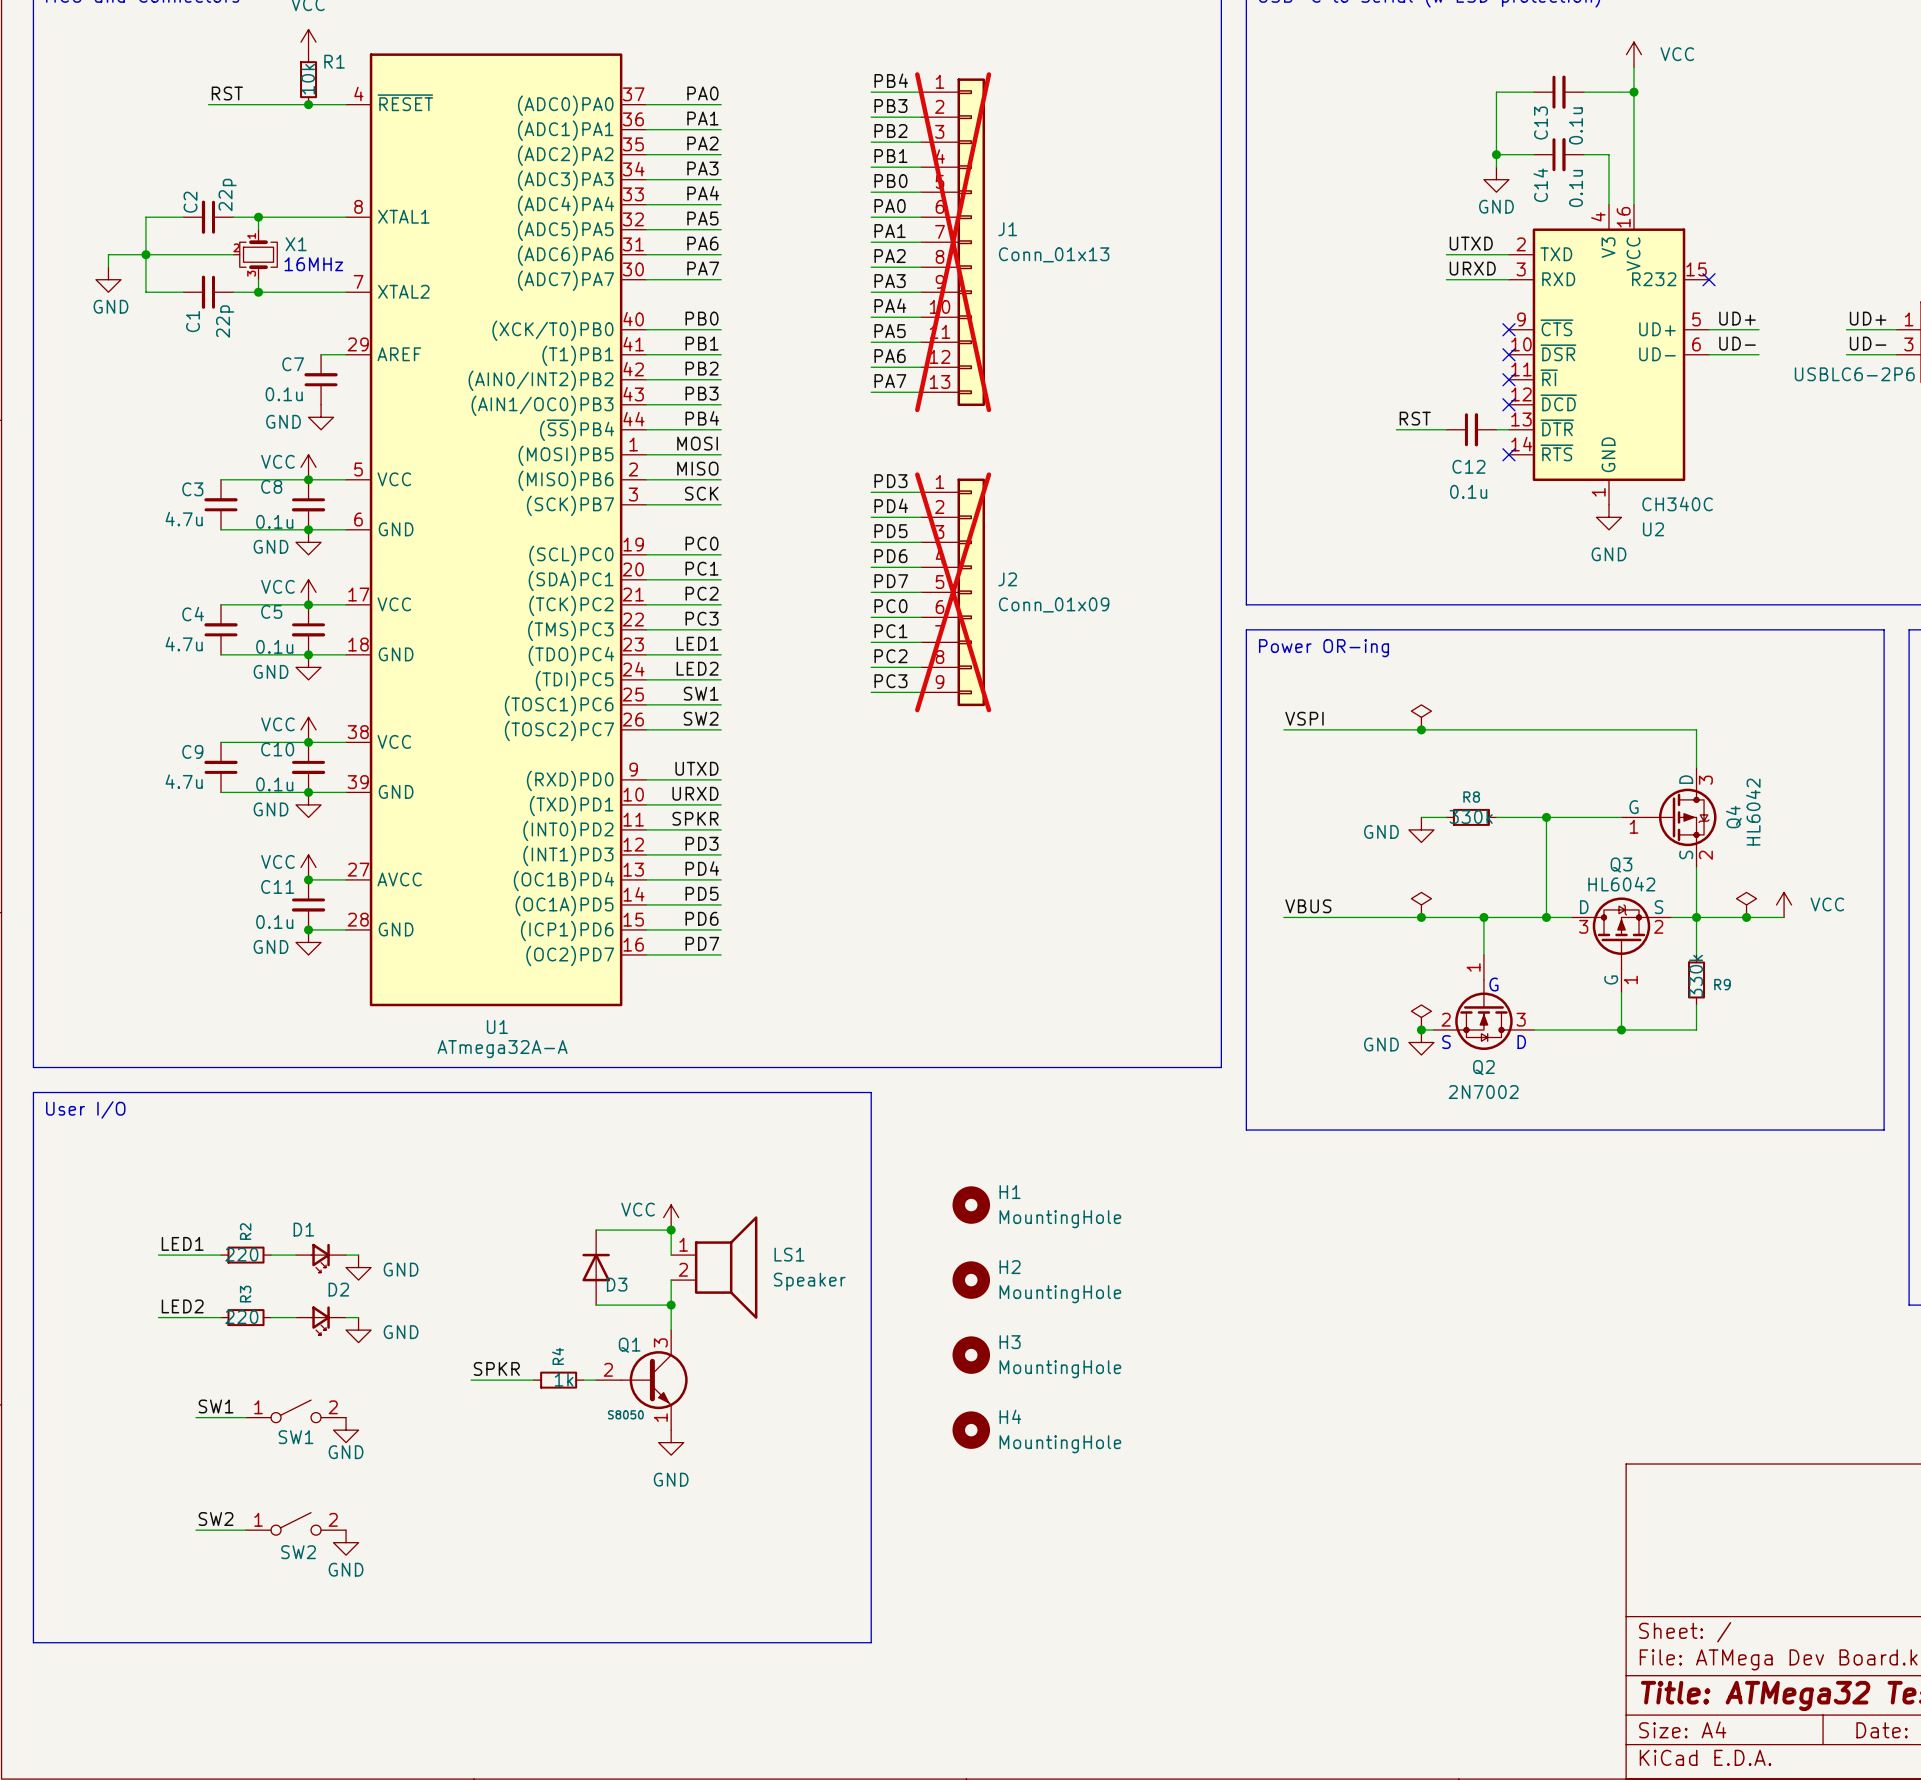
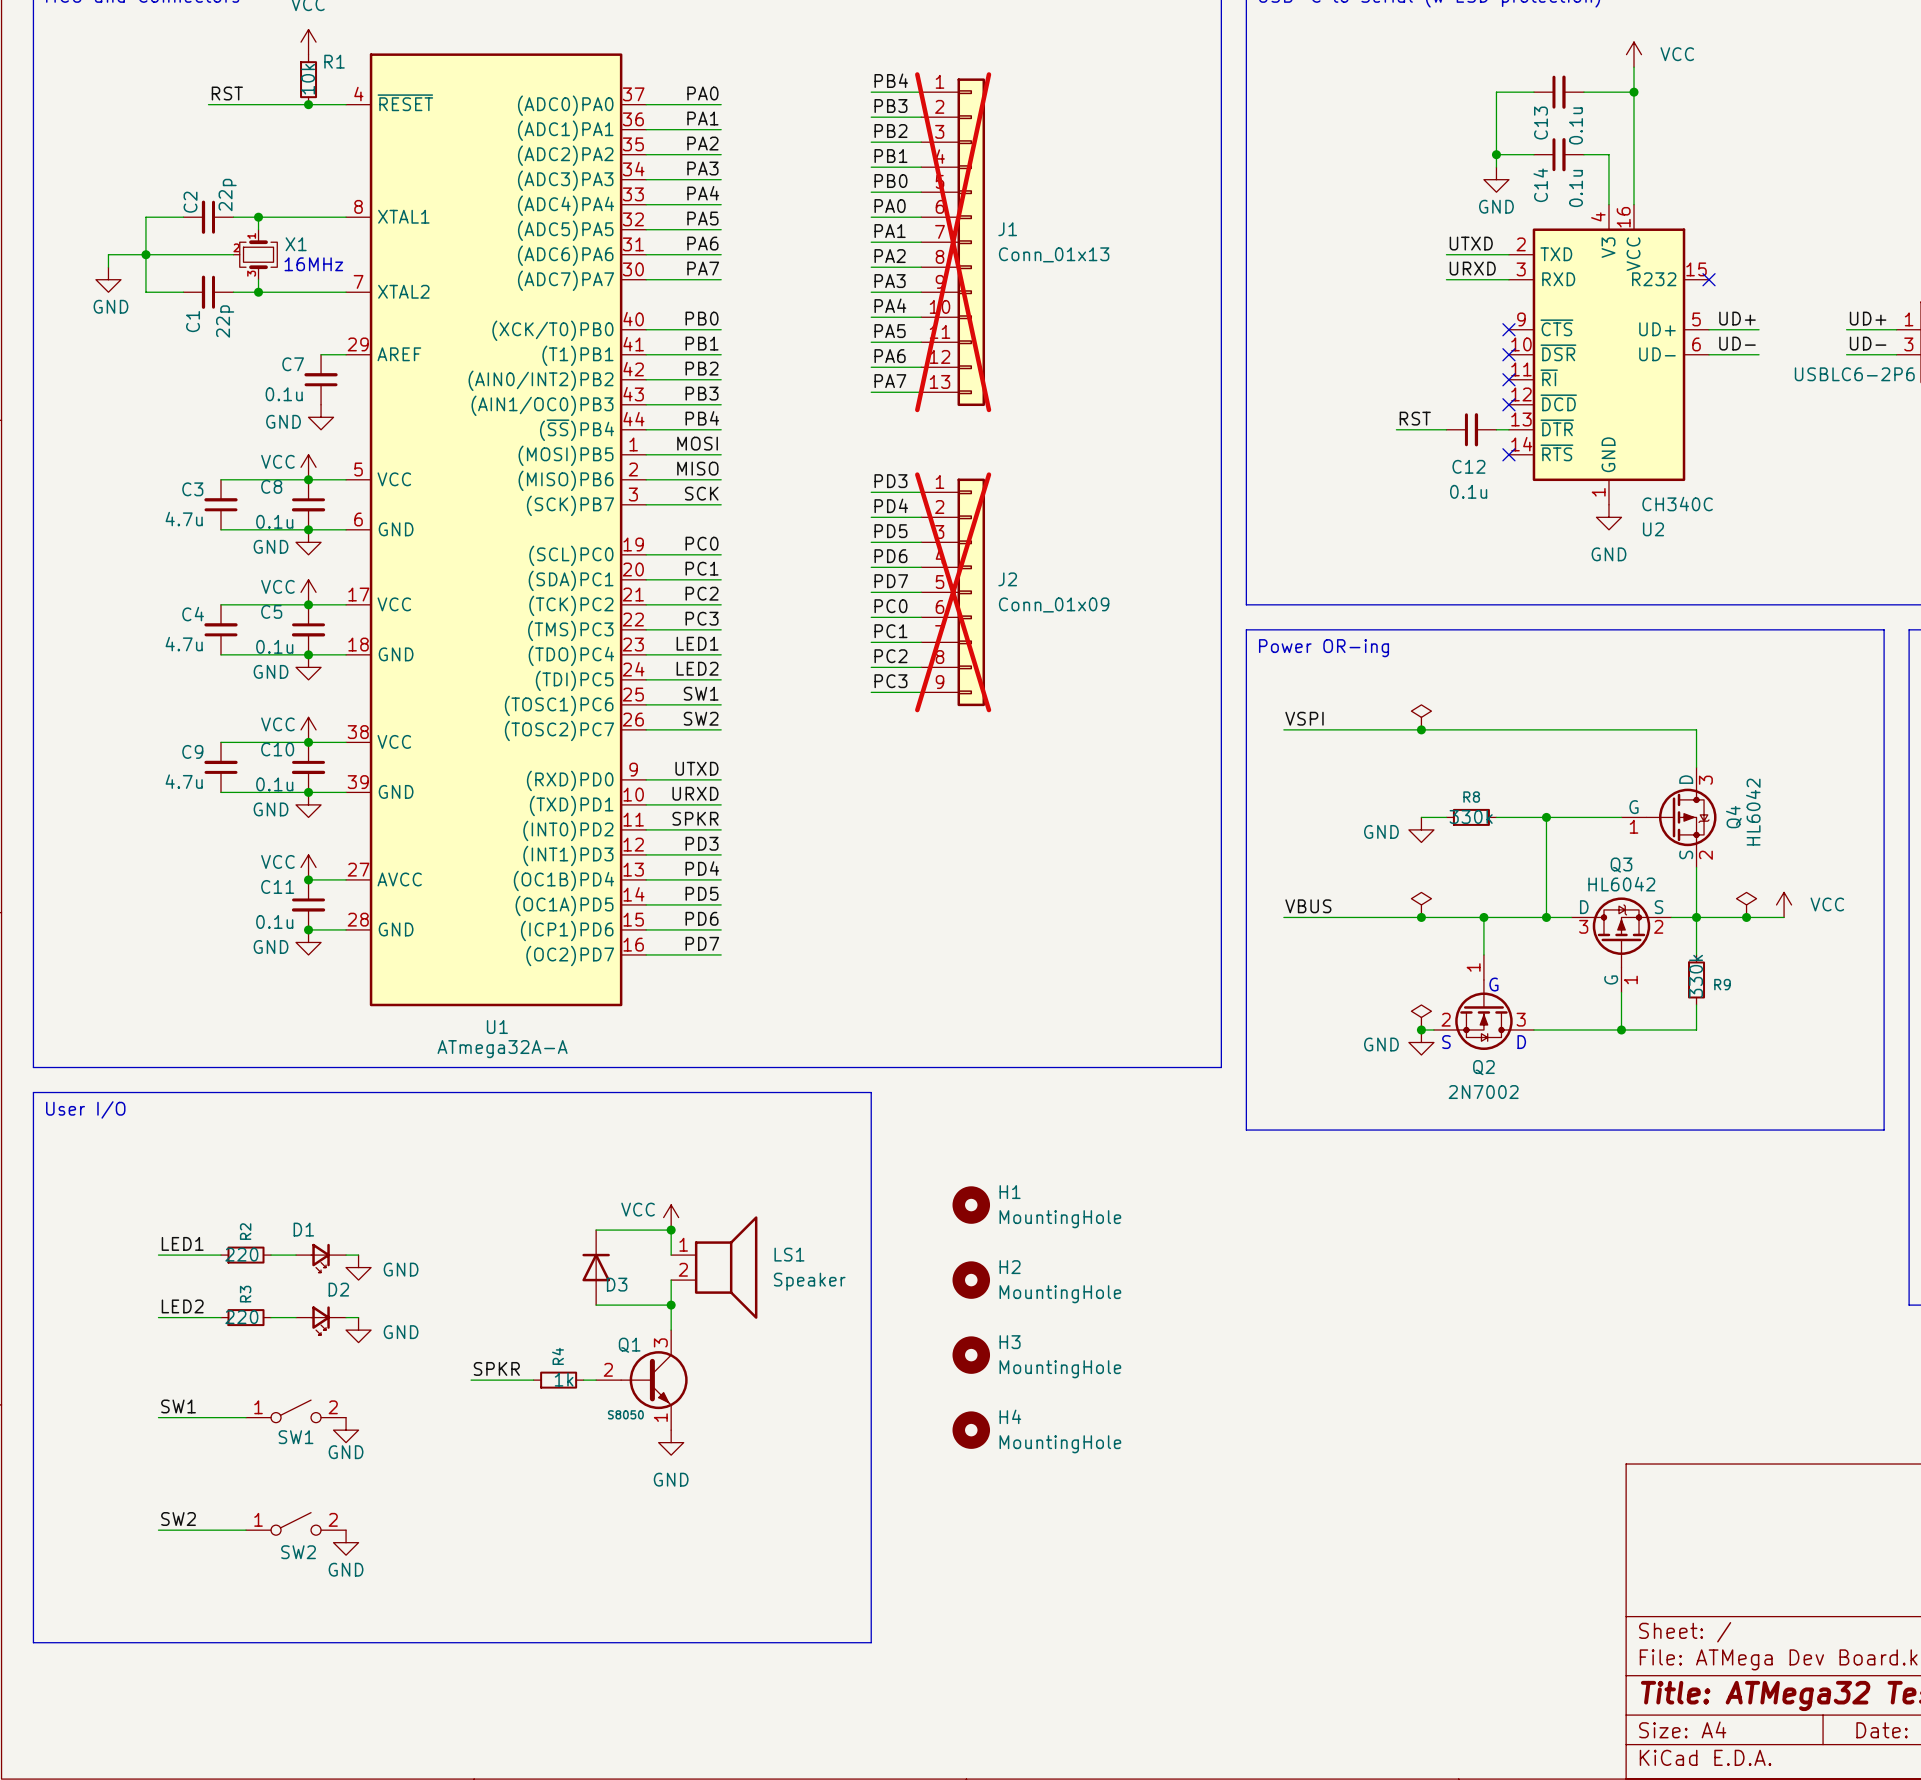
label position: SW1 (216, 1406) -> SW1 (178, 1406)
wire: none -> (158, 1417) (195, 1417)
label position: SW2 (216, 1519) -> SW2 (178, 1519)
wire: none -> (158, 1530) (195, 1530)

